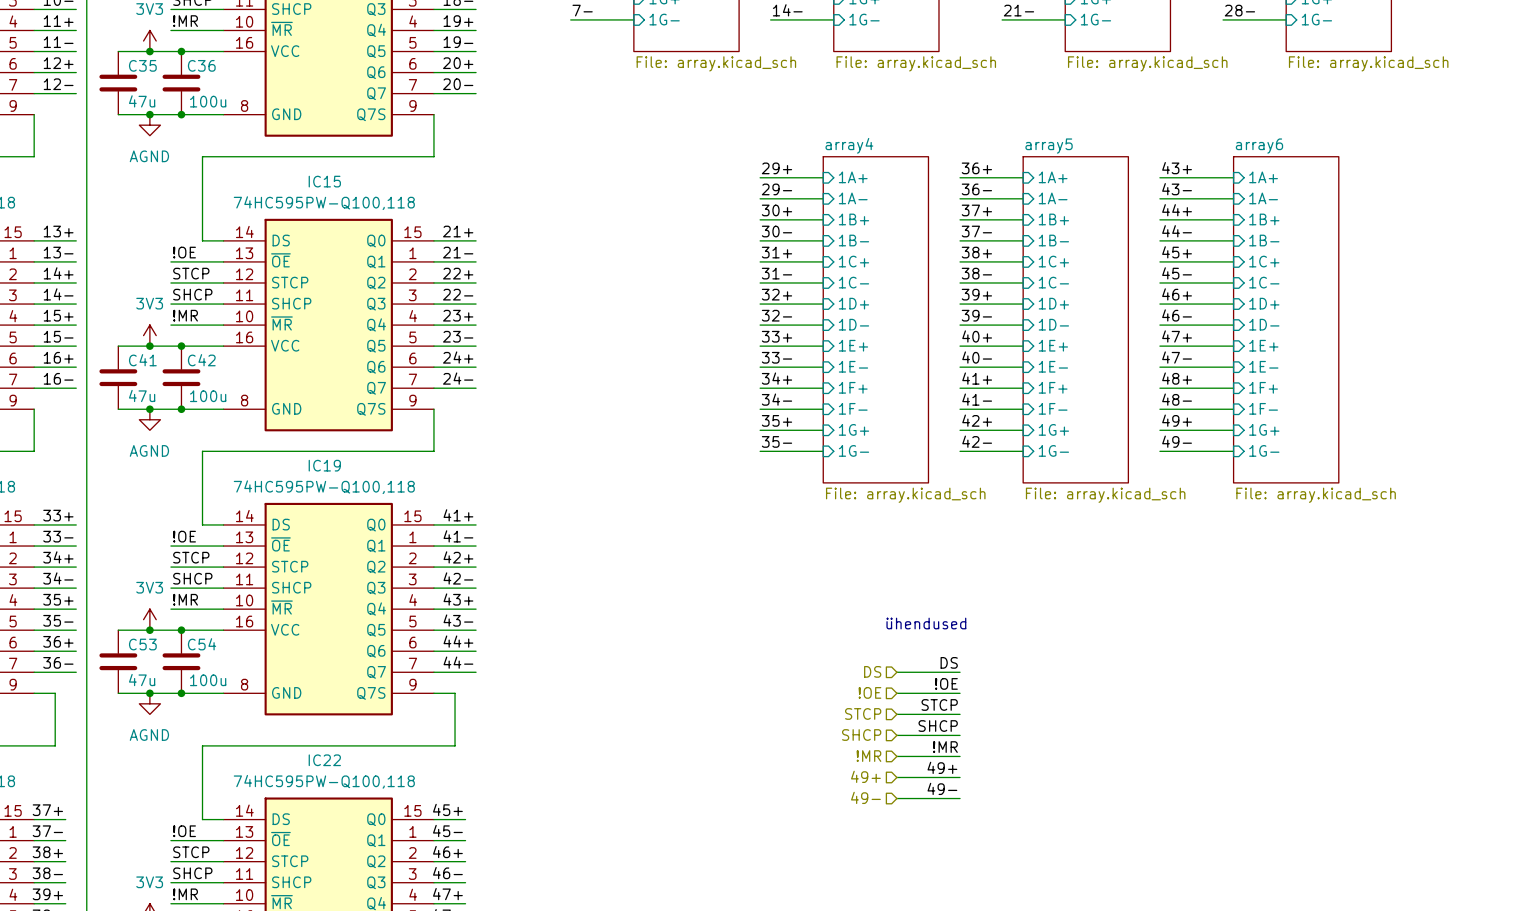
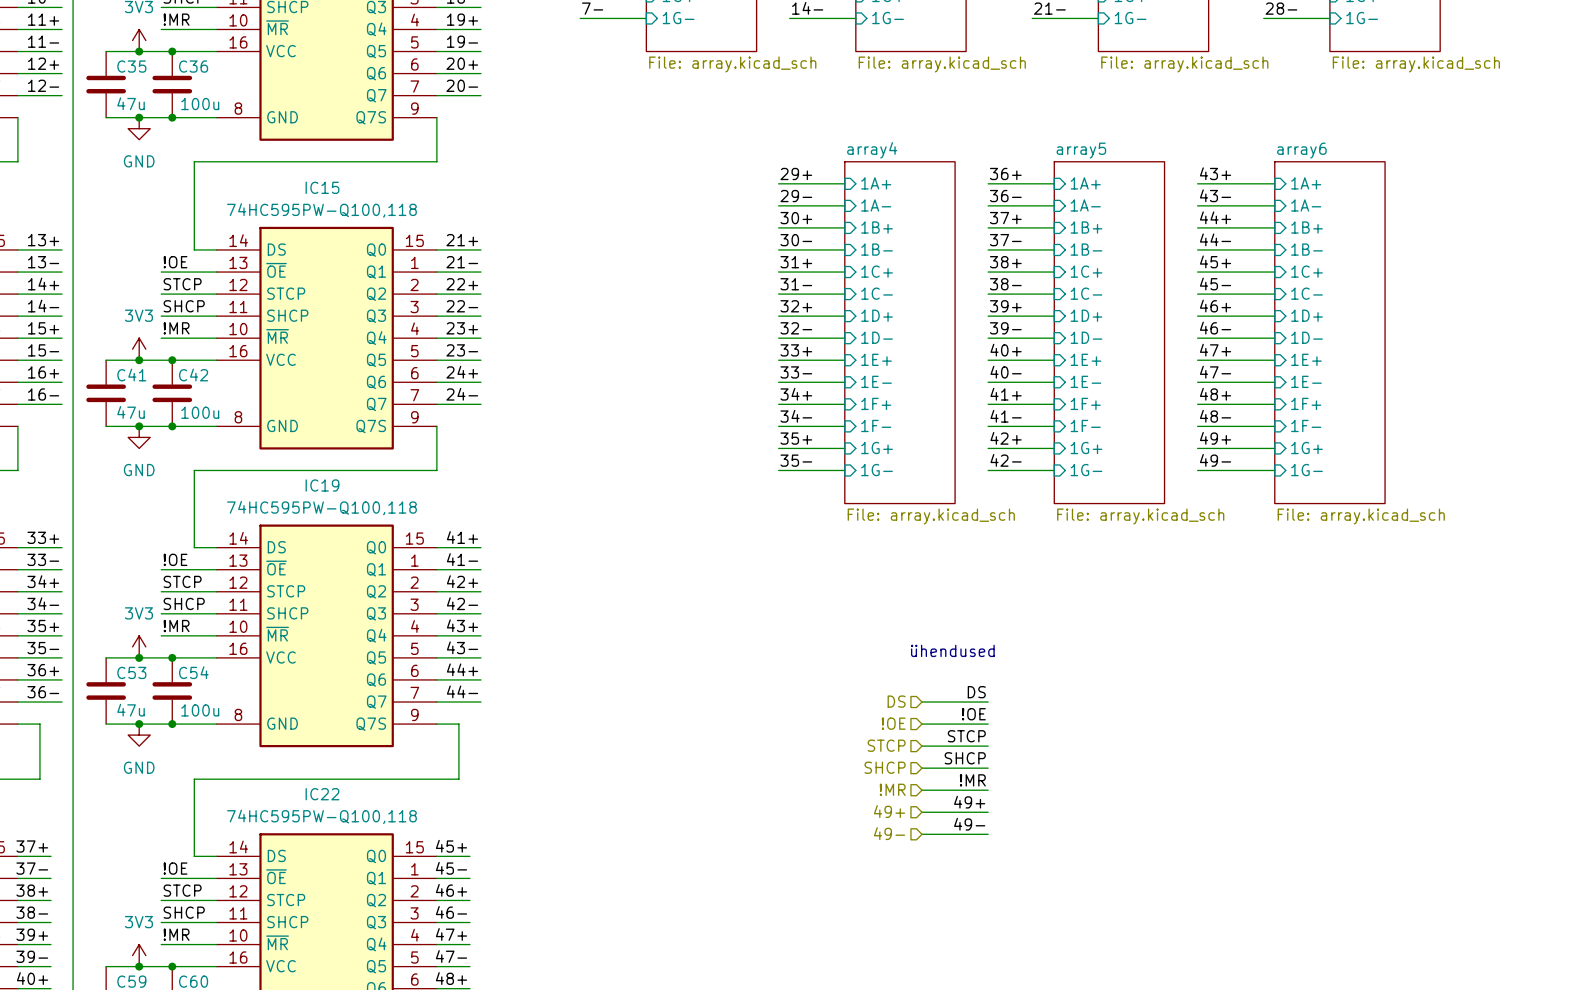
power symbol: AGND (149, 125) -> GND (139, 128)
power symbol: AGND (149, 419) -> GND (139, 437)
power symbol: AGND (149, 703) -> GND (139, 735)

